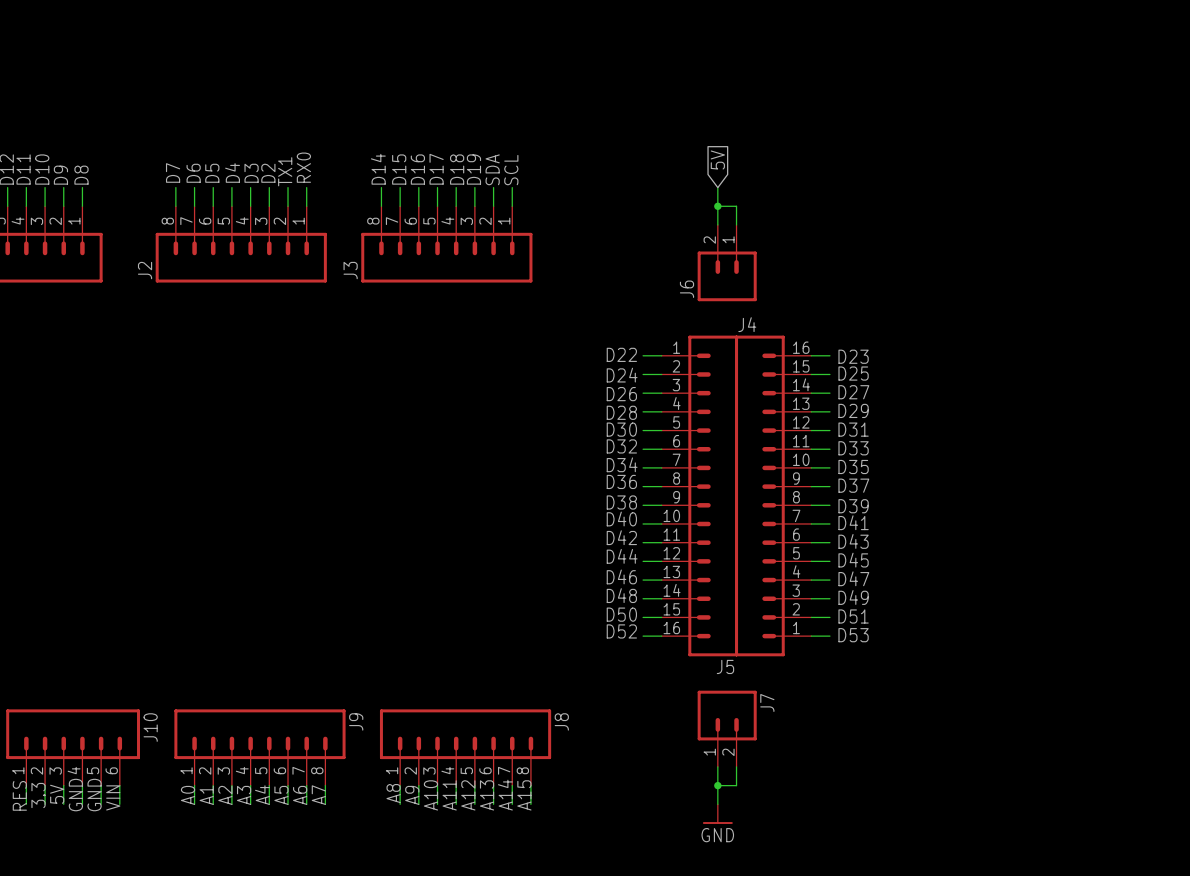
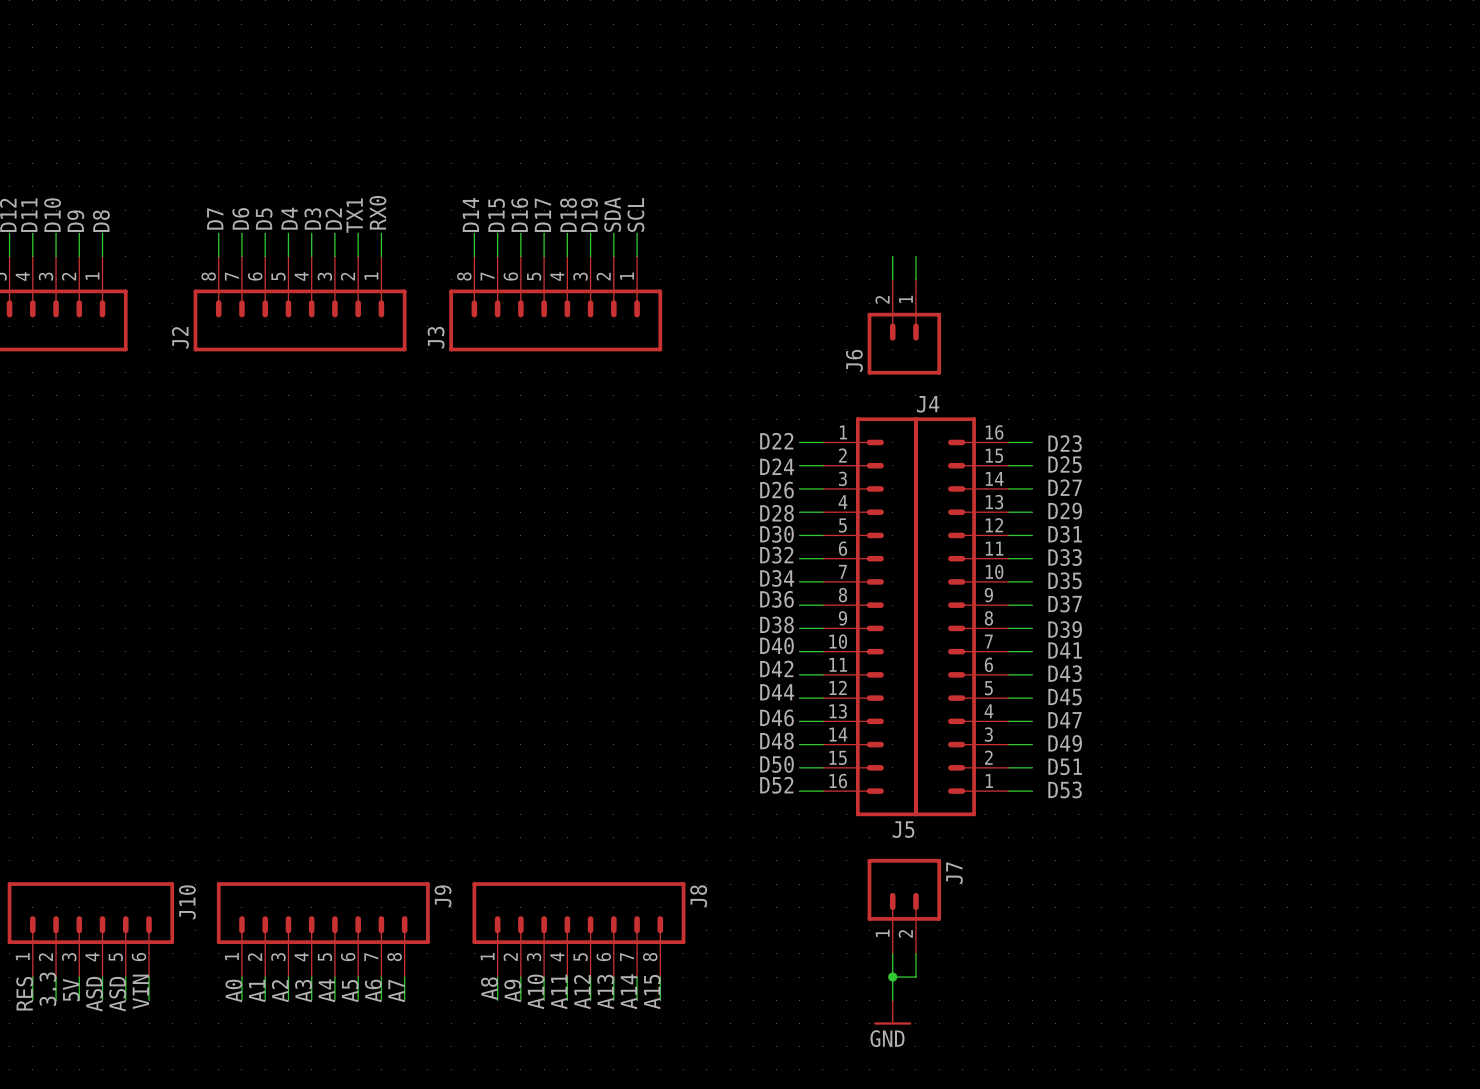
global label: 5V (717, 160) -> none
wire: (717, 187) (717, 206) (736, 206) -> none
junction: (717, 206) -> none
label: GND (75, 795) -> ASD (94, 994)
label: GND (94, 795) -> ASD (117, 994)

